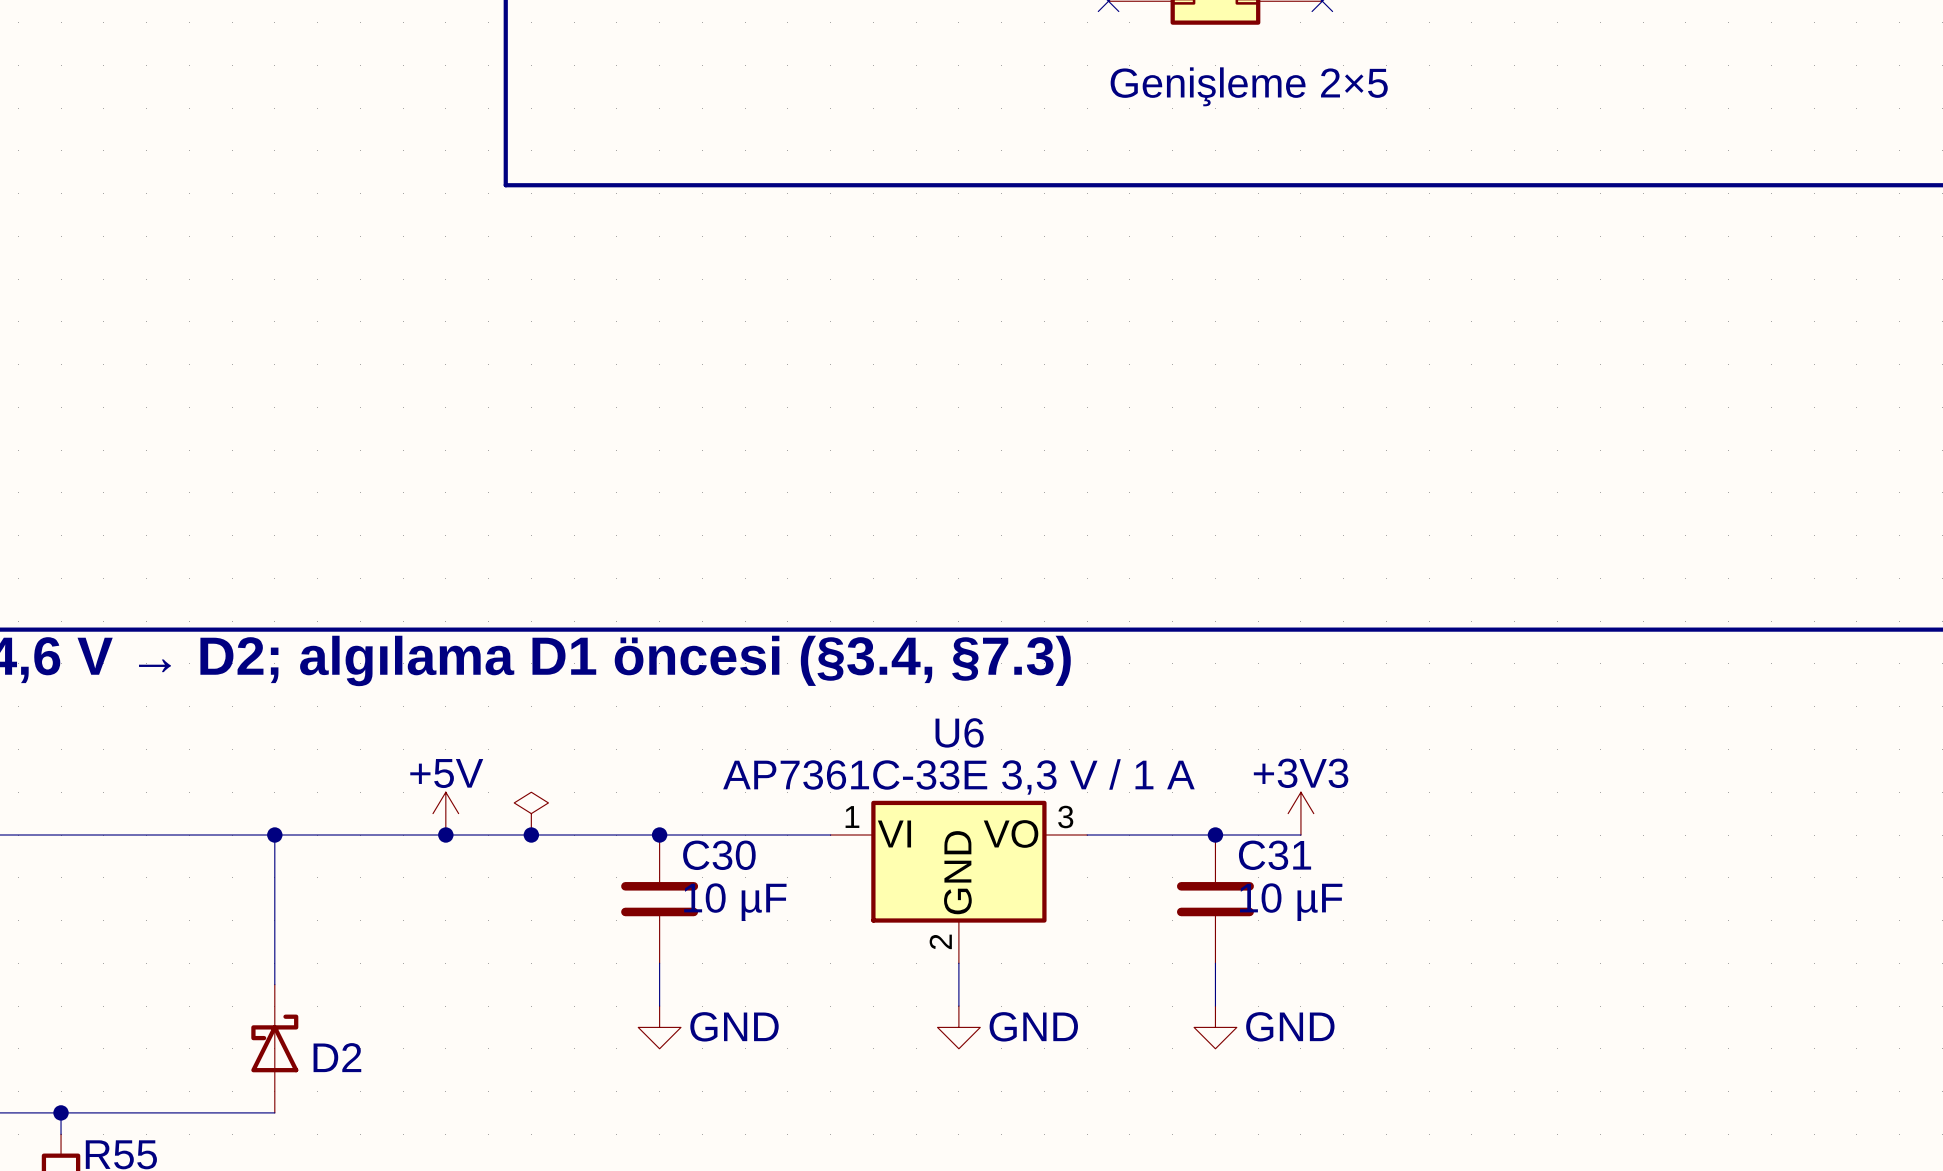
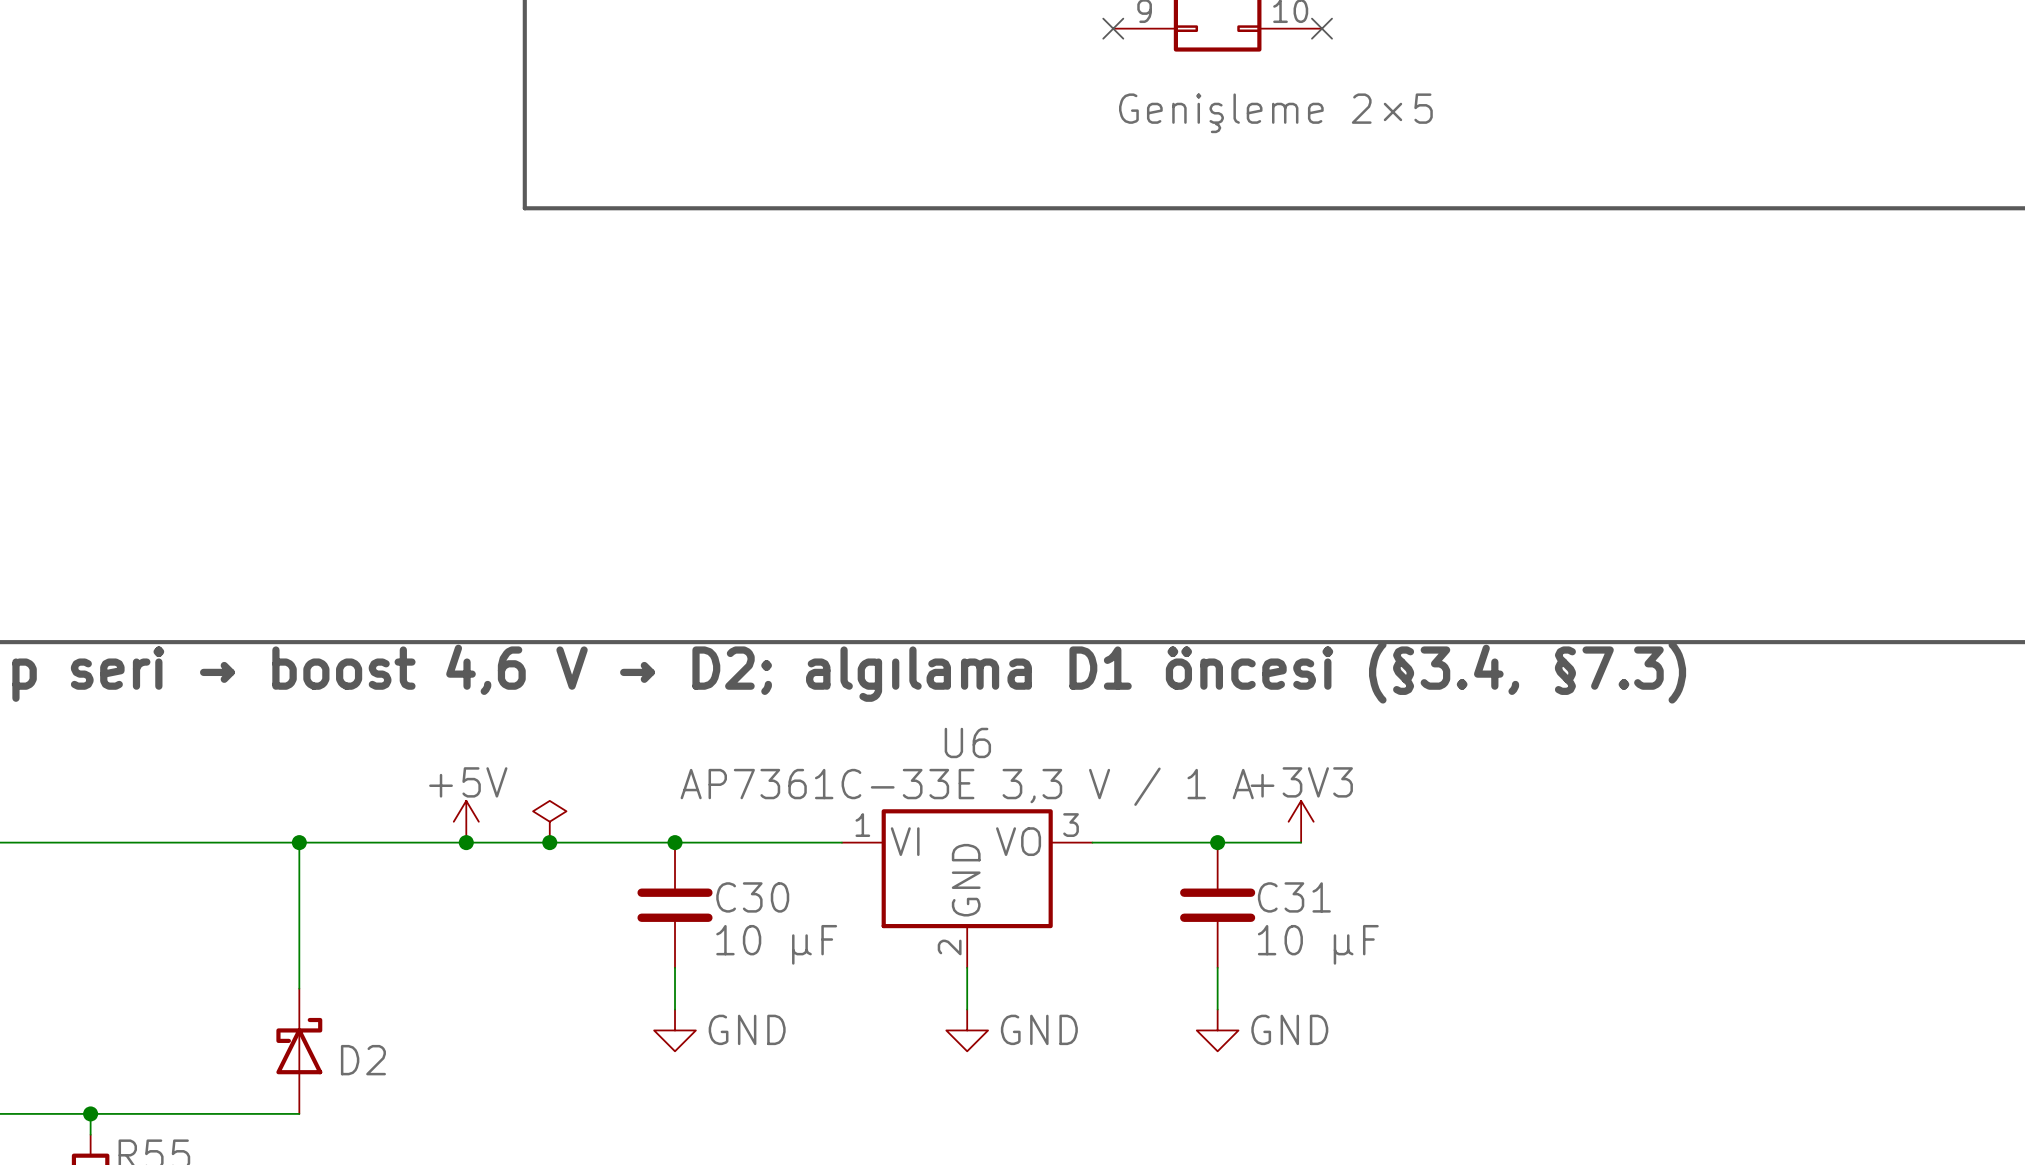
C30 name position: C30 (719, 855) -> C30 (752, 897)
C31 name position: C31 (1275, 855) -> C31 (1294, 897)
C30 value position: 10 µF (735, 902) -> 10 µF (776, 944)
C31 value position: 10 µF (1291, 902) -> 10 µF (1318, 944)

